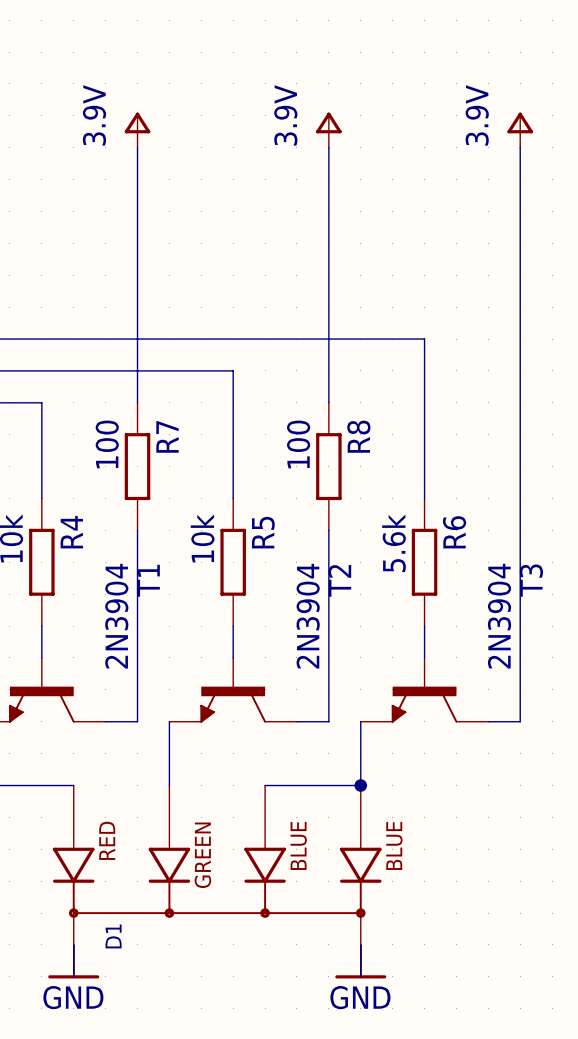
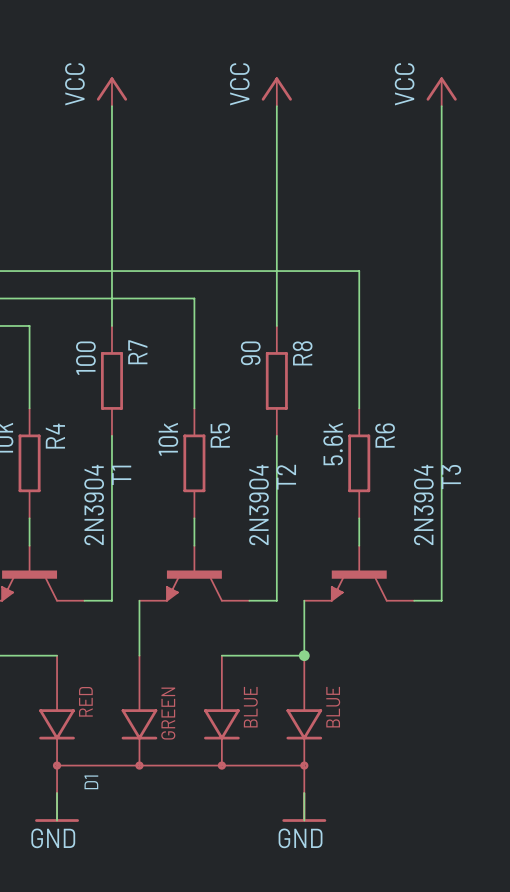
power symbol: 3.9V (137, 130) -> VCC (111, 91)
power symbol: 3.9V (328, 130) -> VCC (276, 91)
power symbol: 3.9V (520, 130) -> VCC (441, 91)
R8 value: 100 (298, 444) -> 90 (250, 353)

